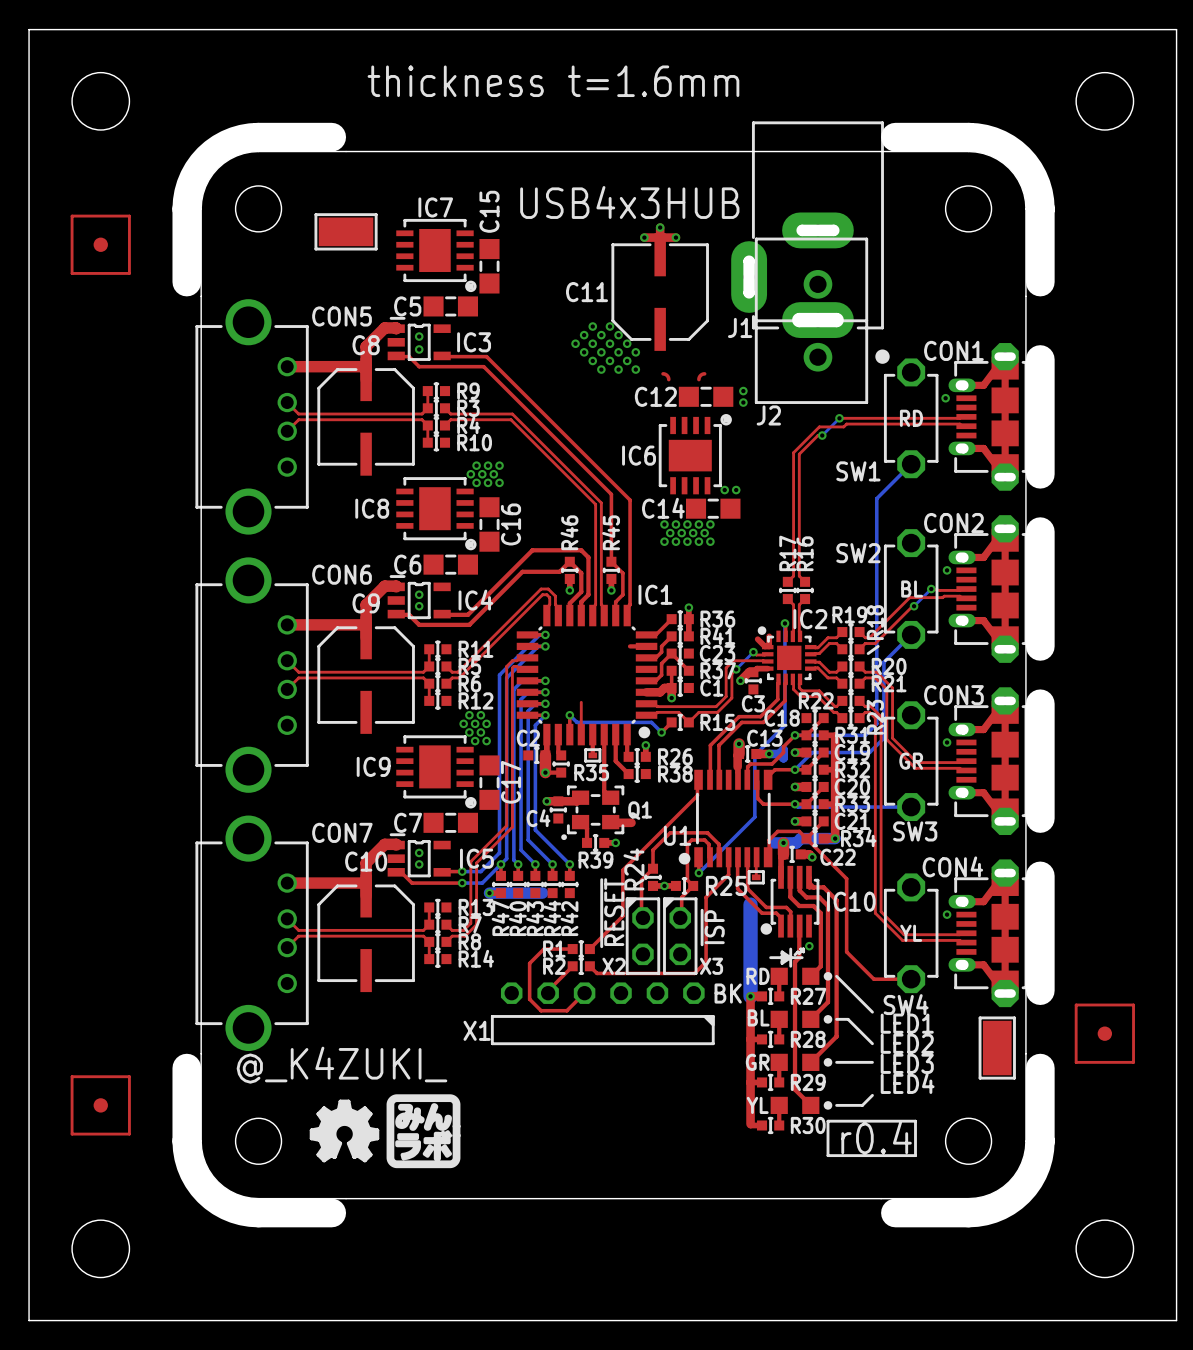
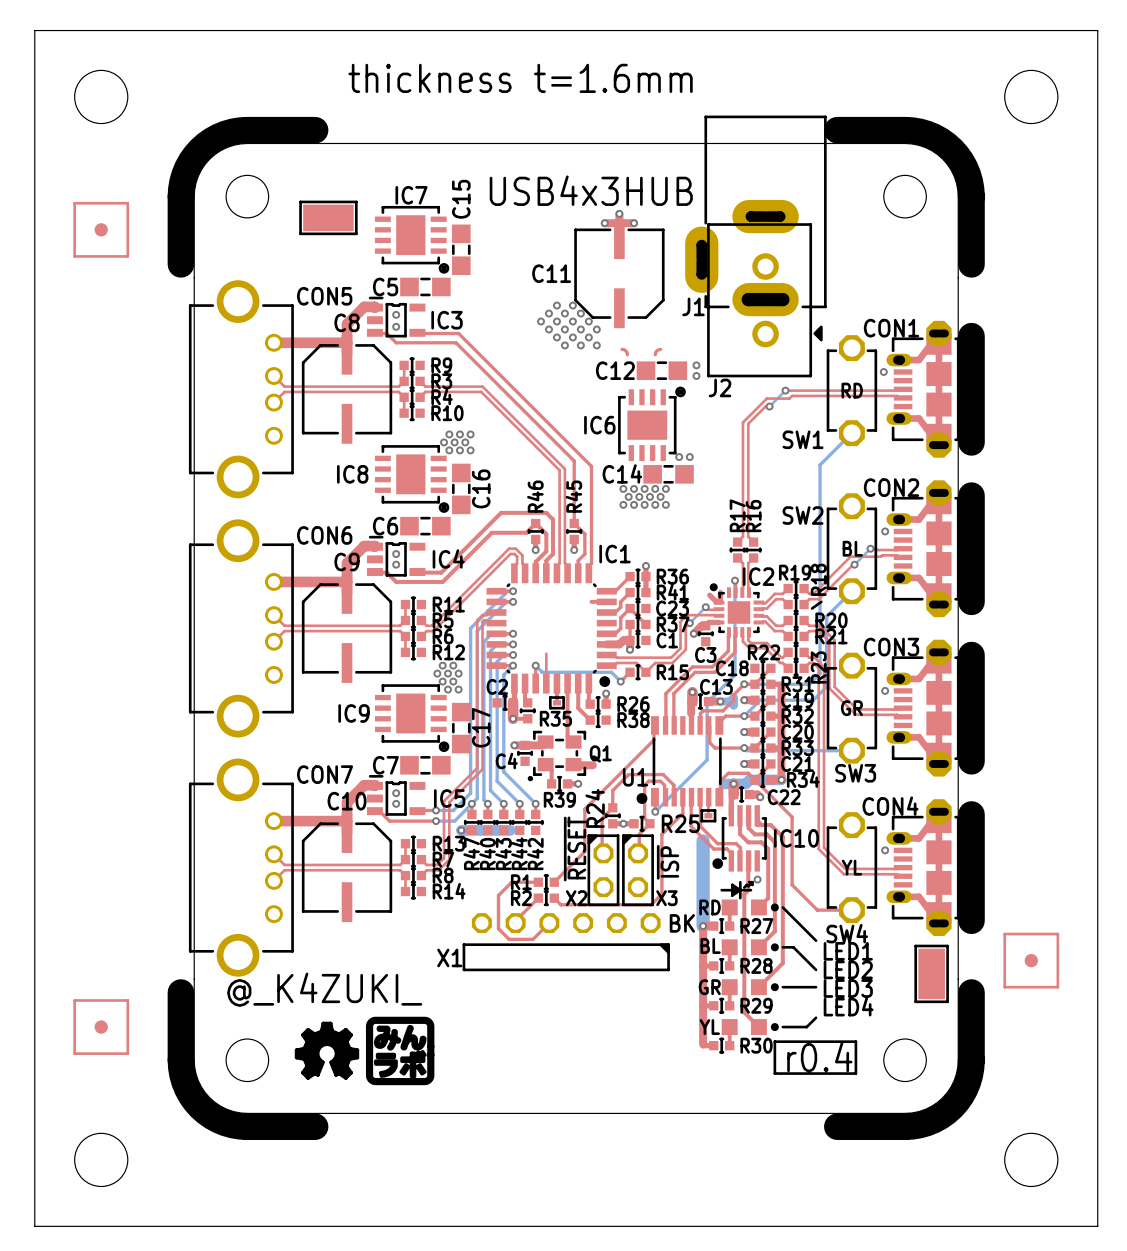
J2 footprint: [754, 237, 890, 404] -> [707, 223, 823, 378]

